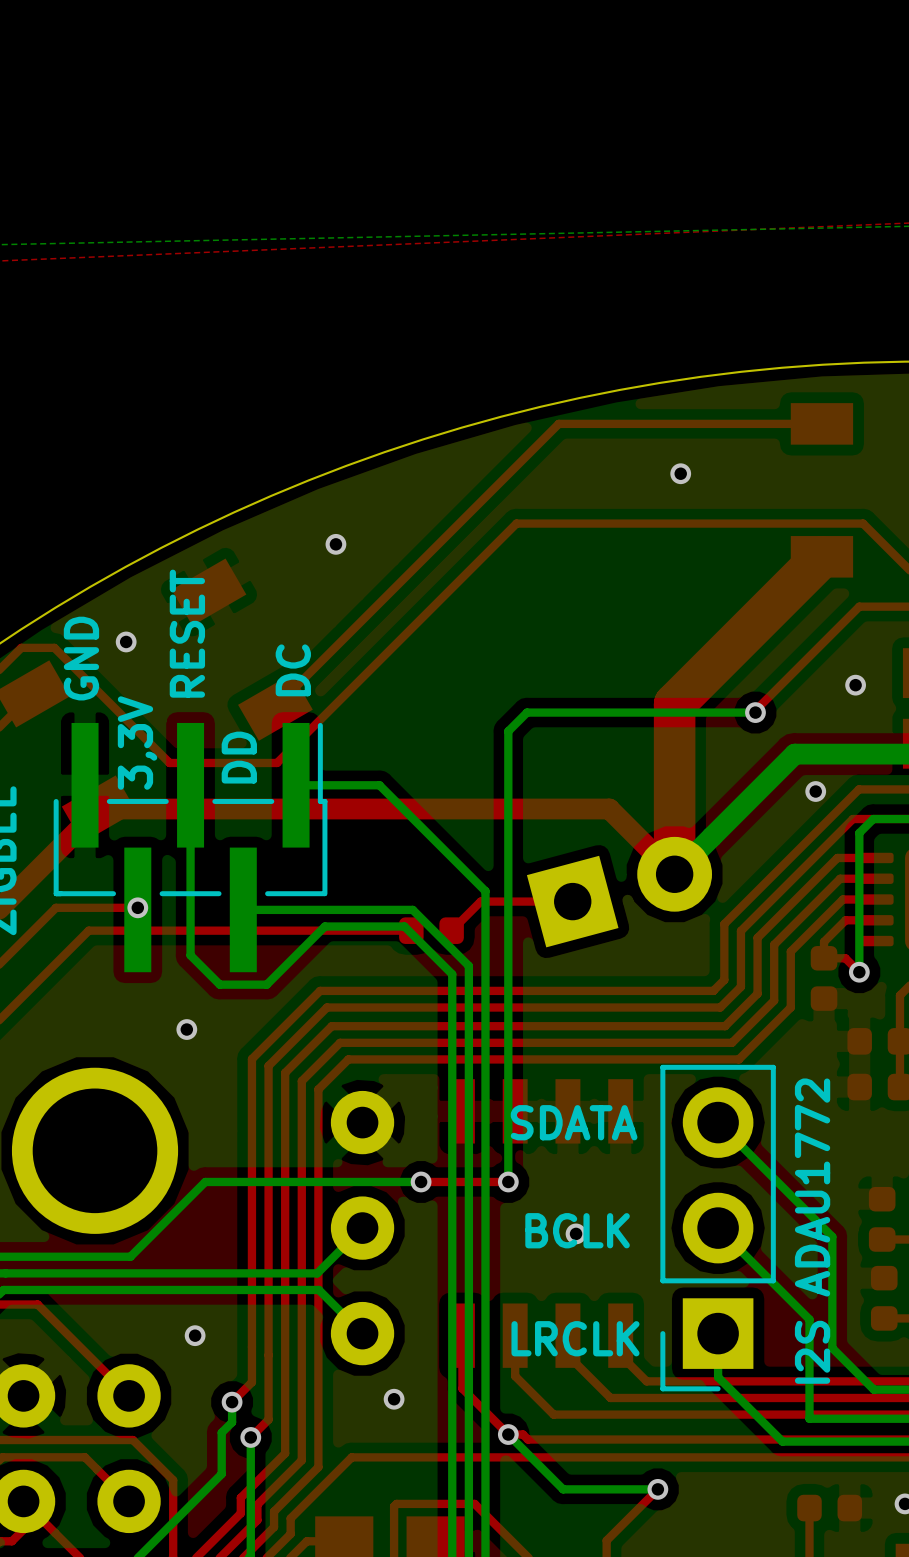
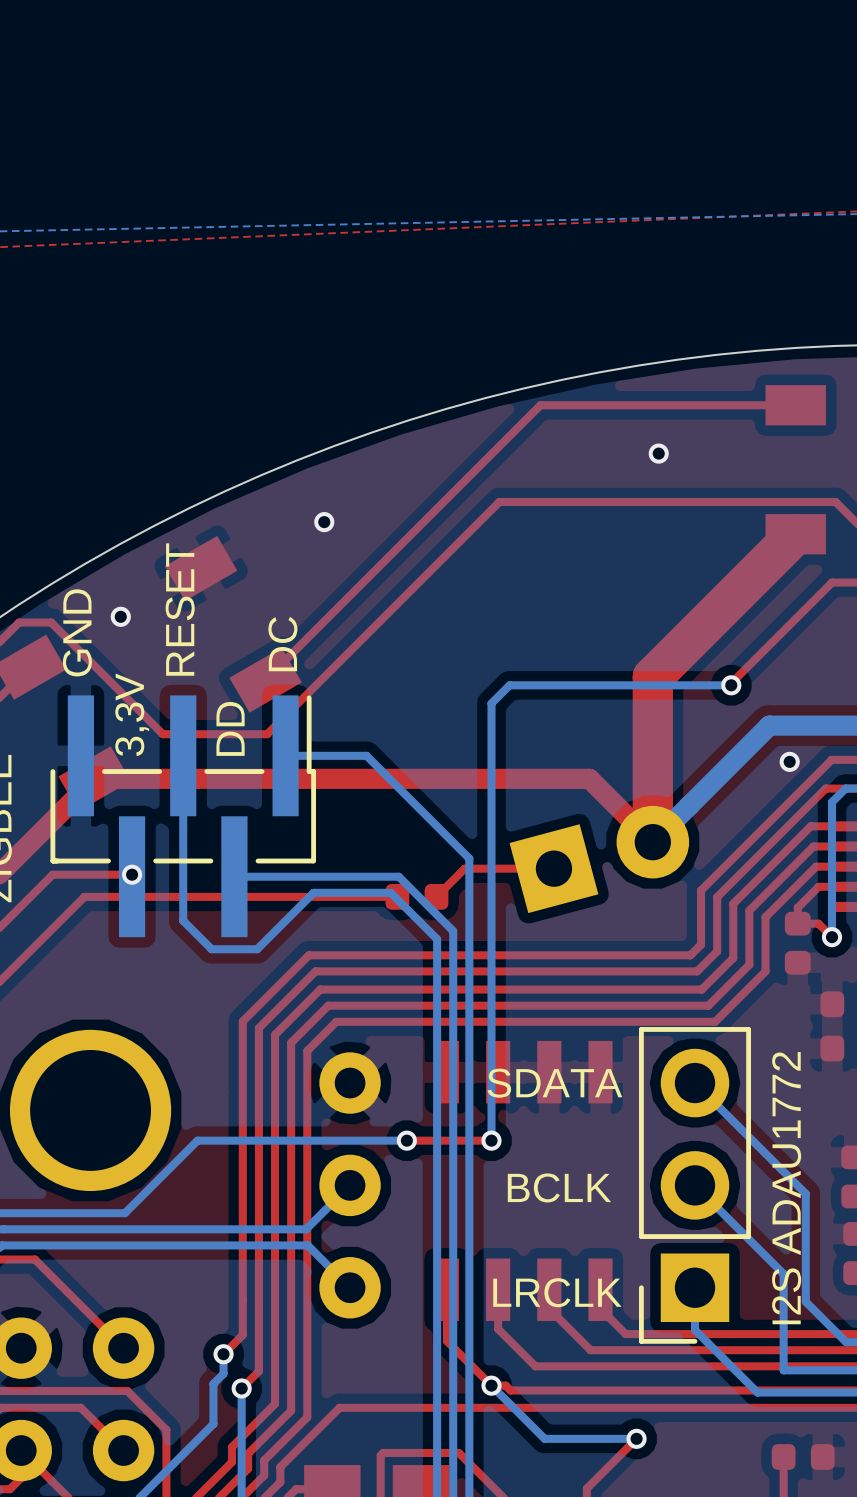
via: (855, 685) -> none
via: (186, 1029) -> none
via: (576, 1233) -> none
via: (195, 1335) -> none
via: (394, 1399) -> none

